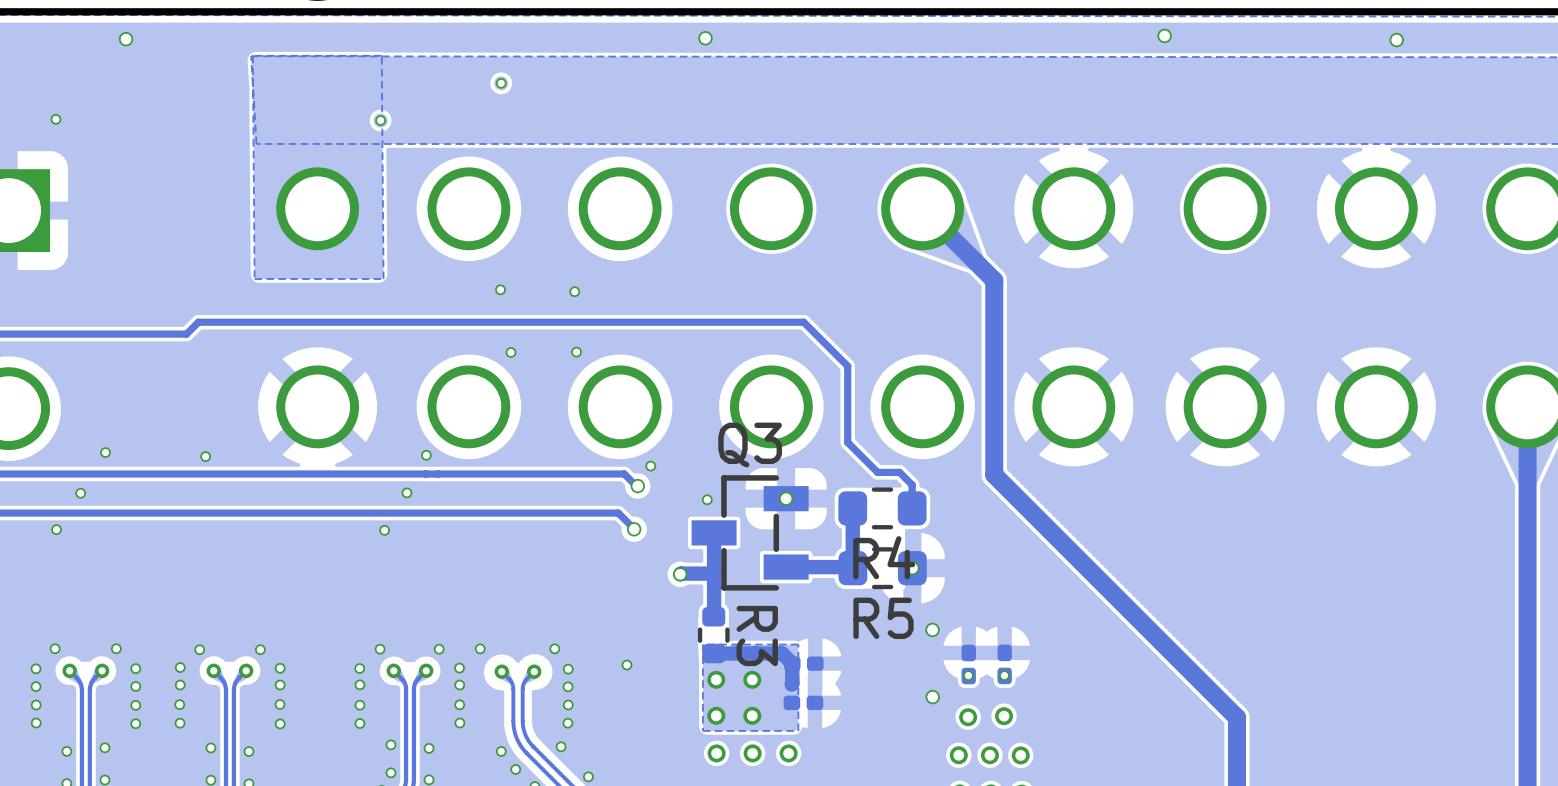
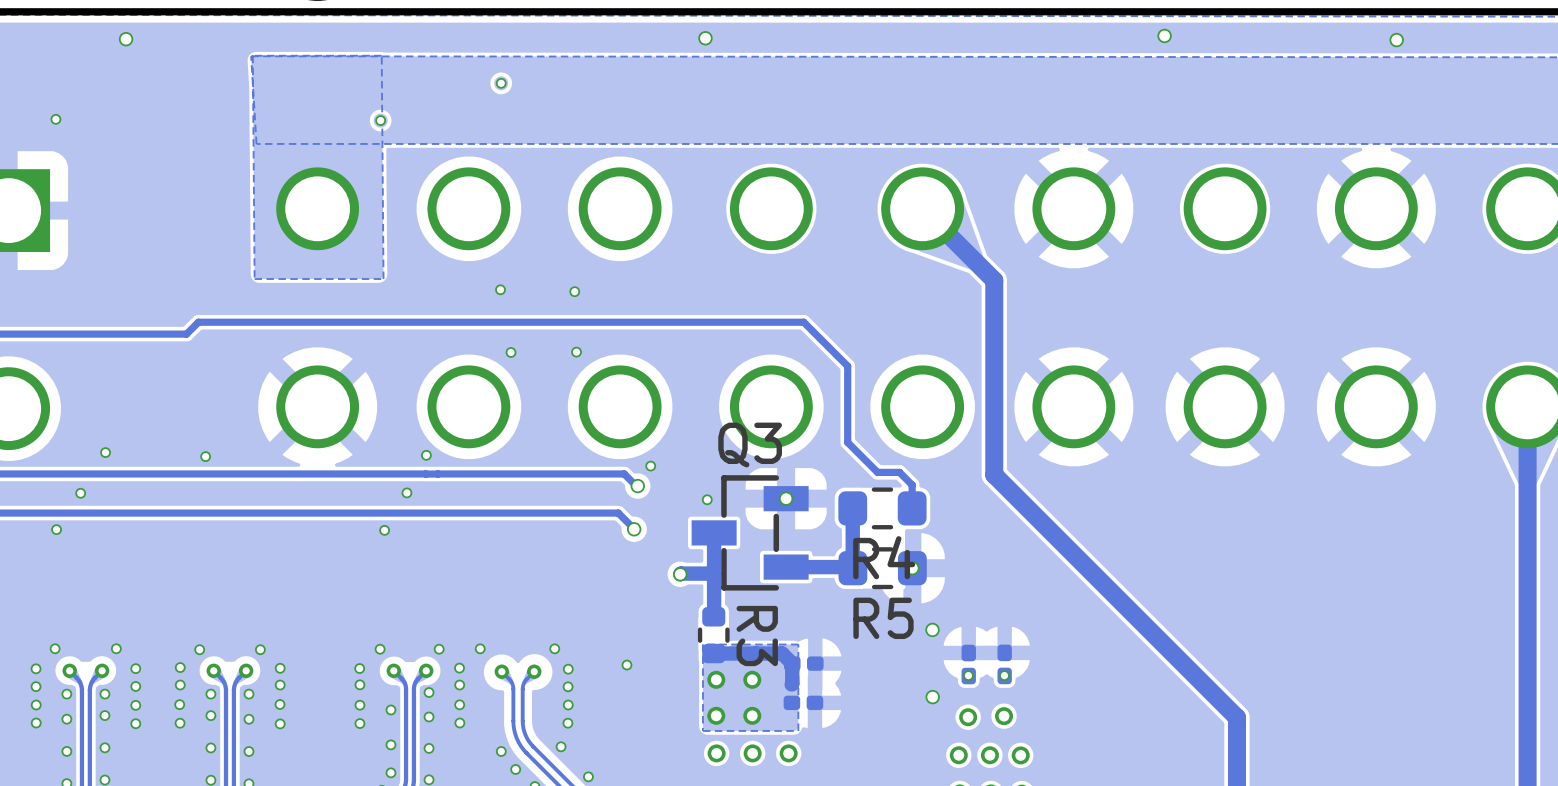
via: none -> (429, 692)
via: none -> (66, 694)
via: none -> (104, 694)
via: none -> (210, 694)
via: none -> (248, 694)
via: none -> (390, 709)
via: none -> (104, 715)
via: none -> (210, 715)
via: none -> (429, 716)
via: none -> (66, 719)
via: none -> (248, 719)

